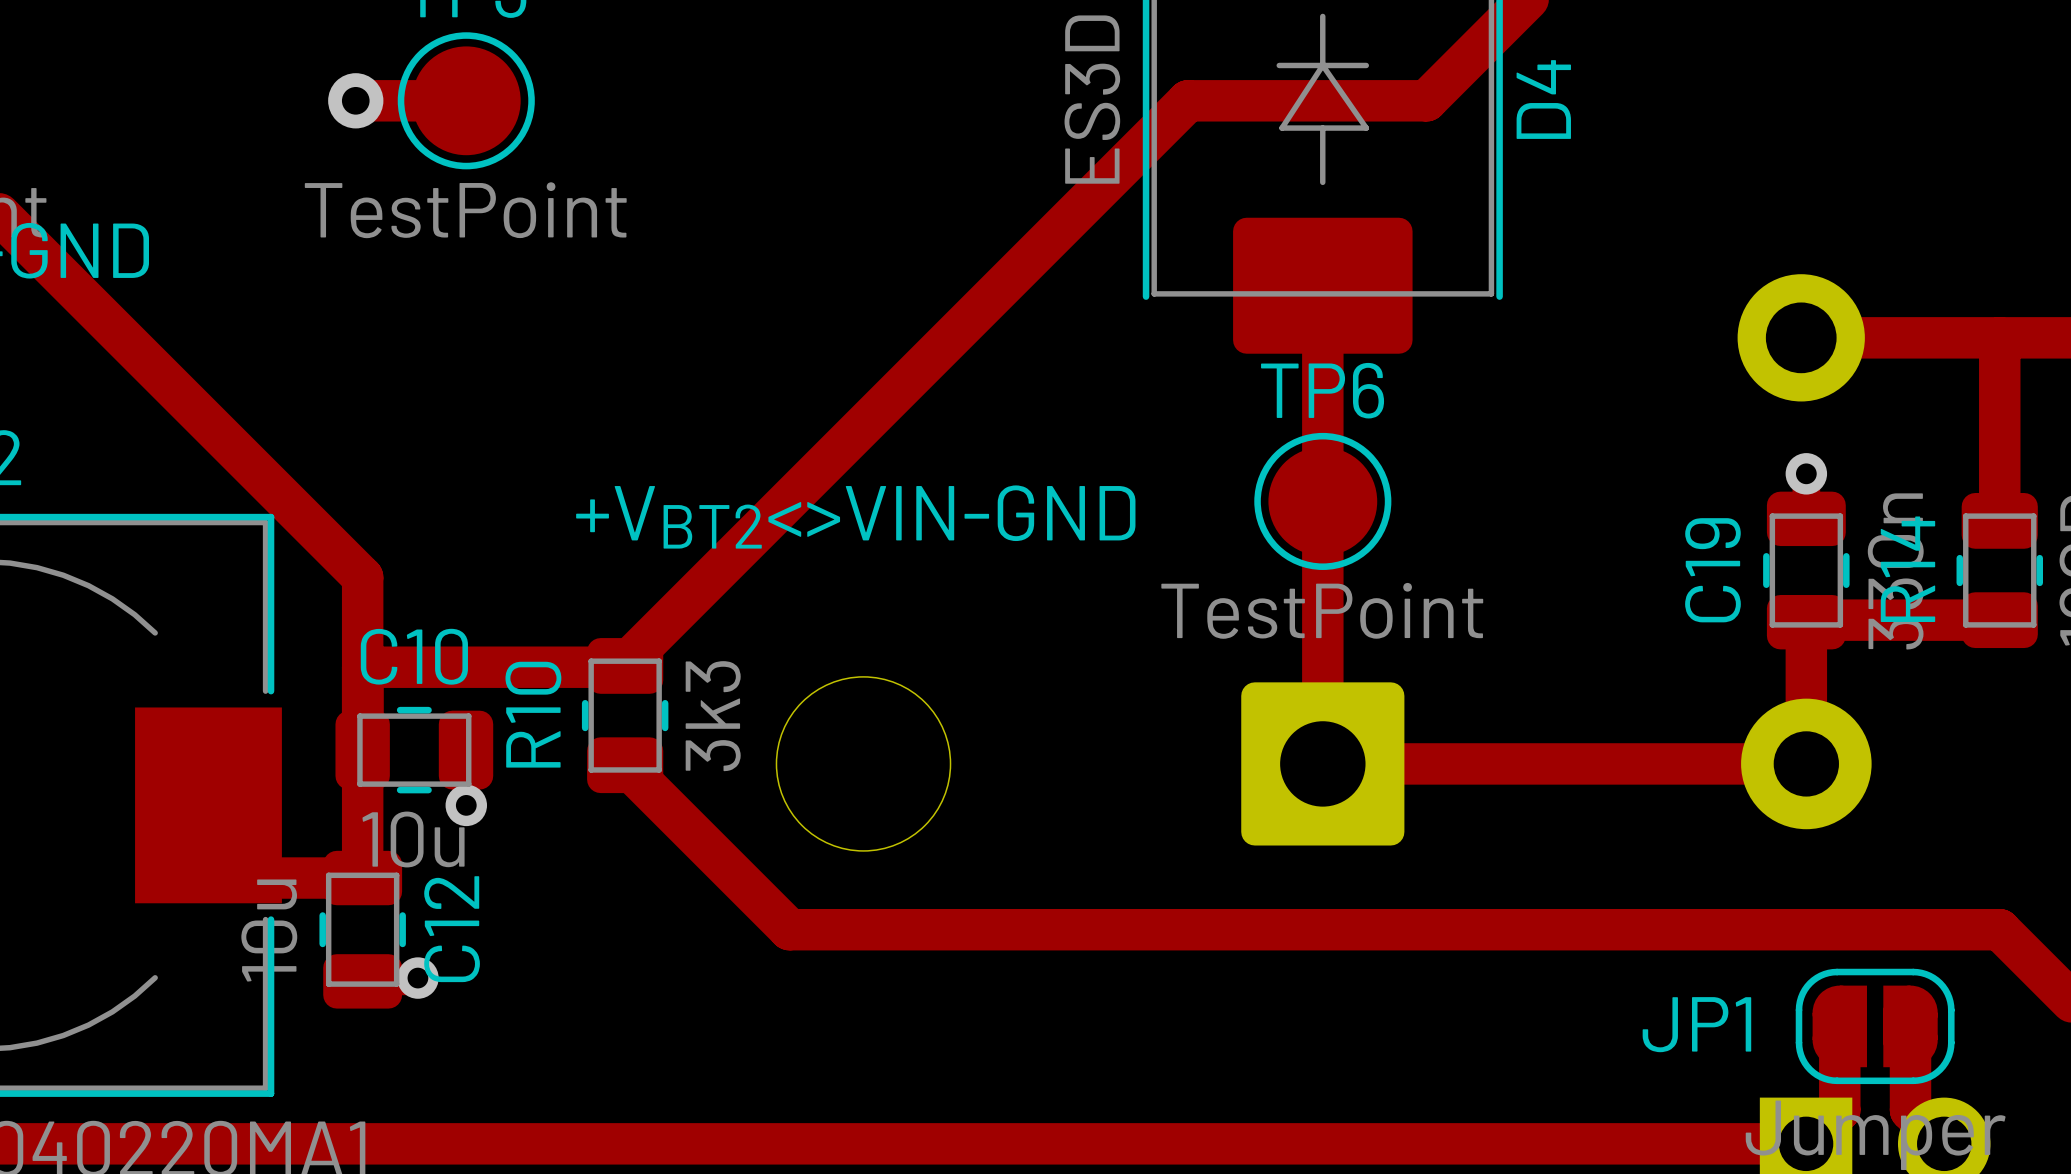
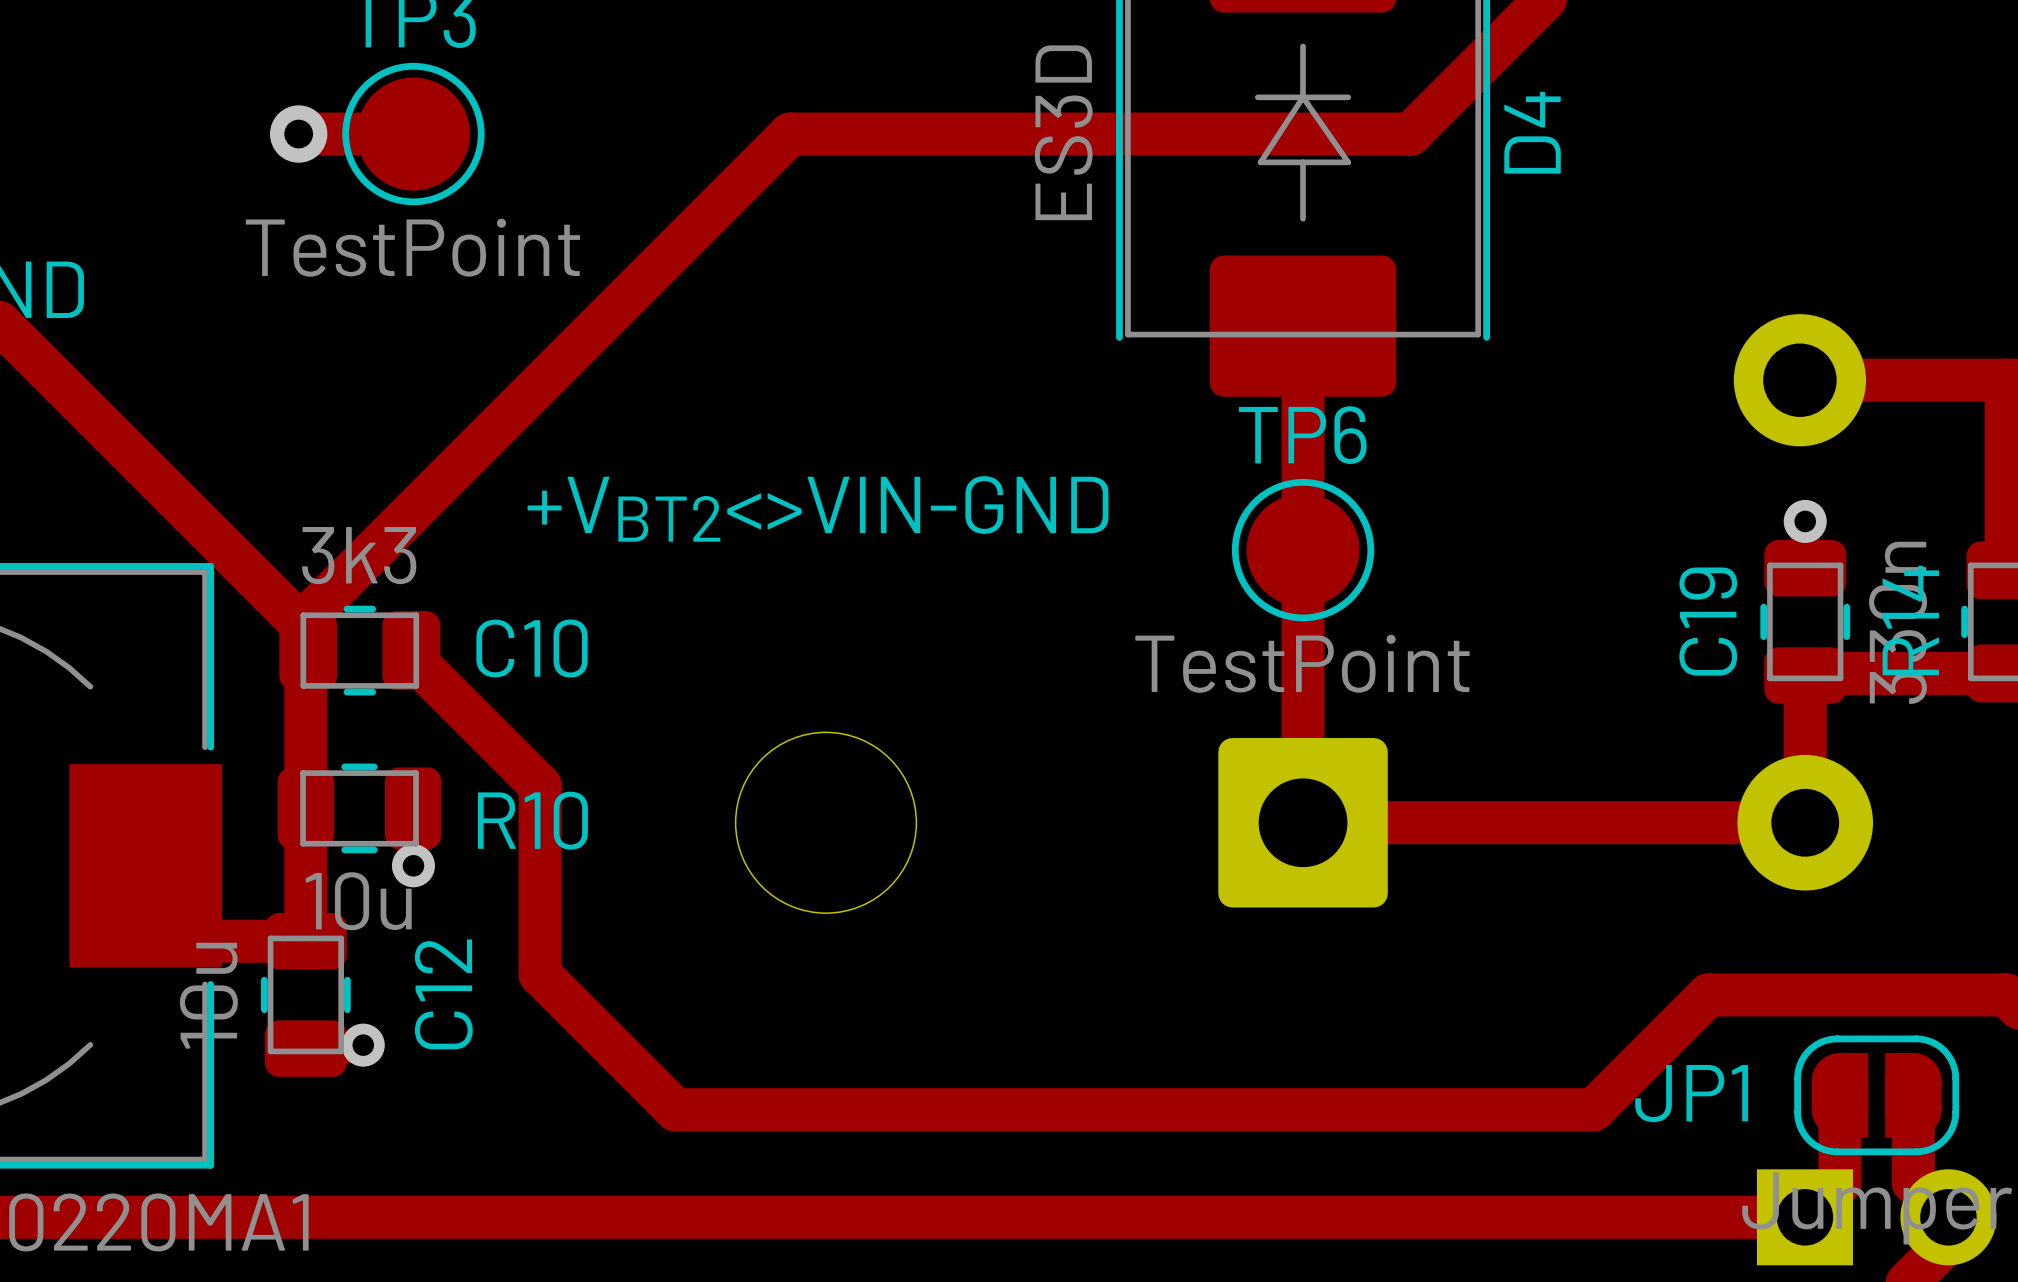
track: (1188, 100) (621, 667) (362, 667) -> (1163, 134) (790, 134) (308, 616) (308, 650) (305, 652)
text position: +VBT2<>VIN-GND (855, 516) -> +VBT2<>VIN-GND (818, 508)
C10 name position: C10 (414, 656) -> C10 (532, 648)
R10 name position: R10 (533, 714) -> R10 (532, 820)
R10 rotation: 0° (625, 715) -> 90° clockwise (359, 650)
R10 position: (625, 715) -> (359, 650)
R10 value position: 3k3 (713, 716) -> 3k3 (359, 555)
track: (625, 765) (789, 929) (1713, 929) -> (411, 650) (411, 656) (540, 785) (540, 974) (675, 1109) (1593, 1109) (1708, 994)
C12 name position: C12 (452, 929) -> C12 (443, 994)

